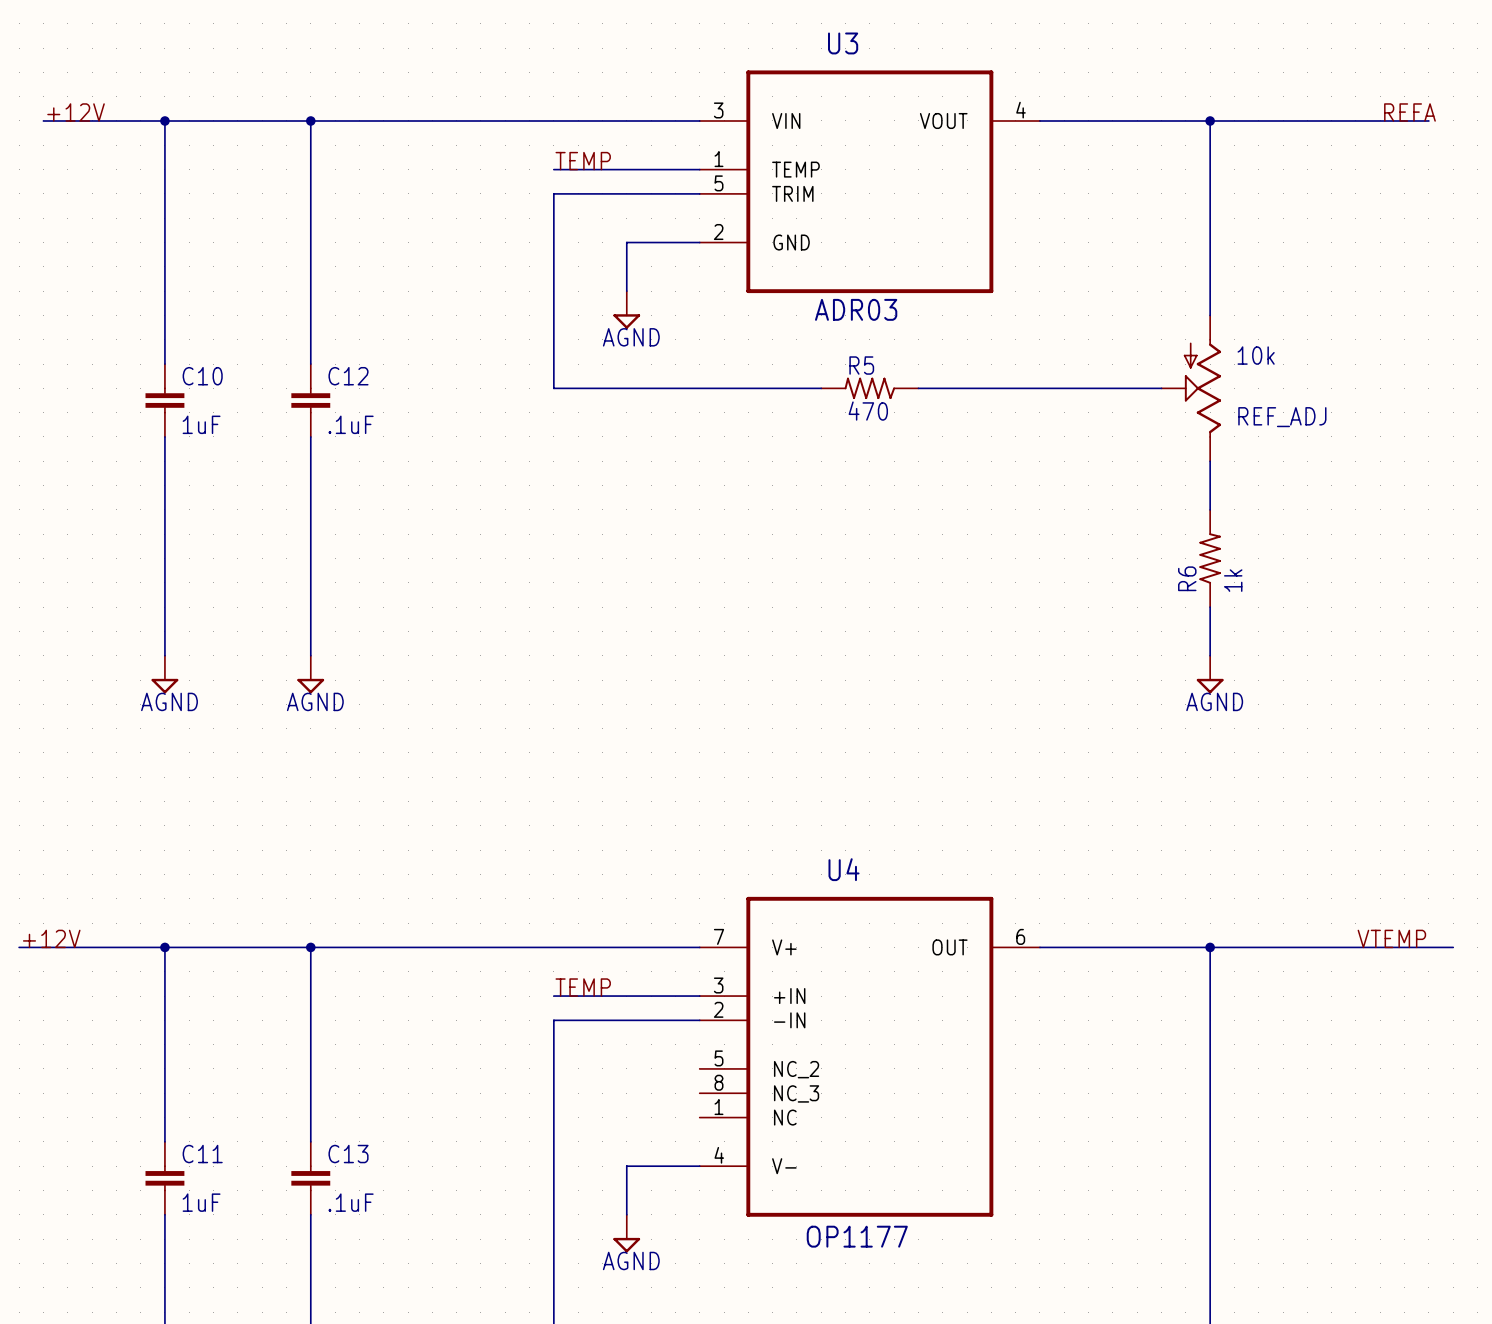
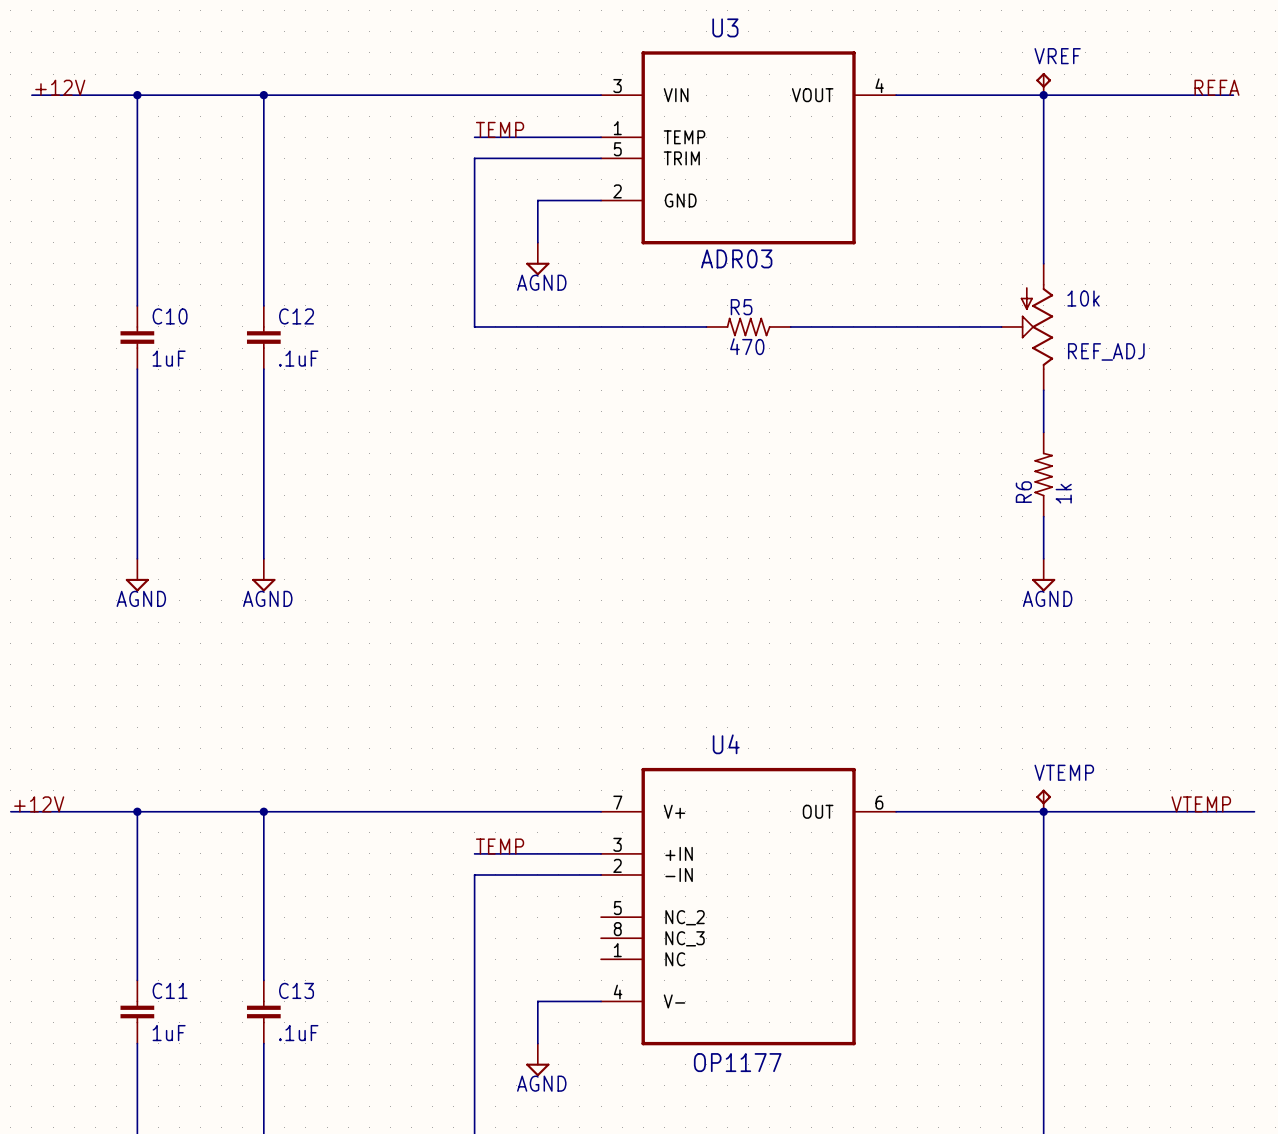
VREF: none -> (1043, 84)
VTEMP: none -> (1043, 800)

